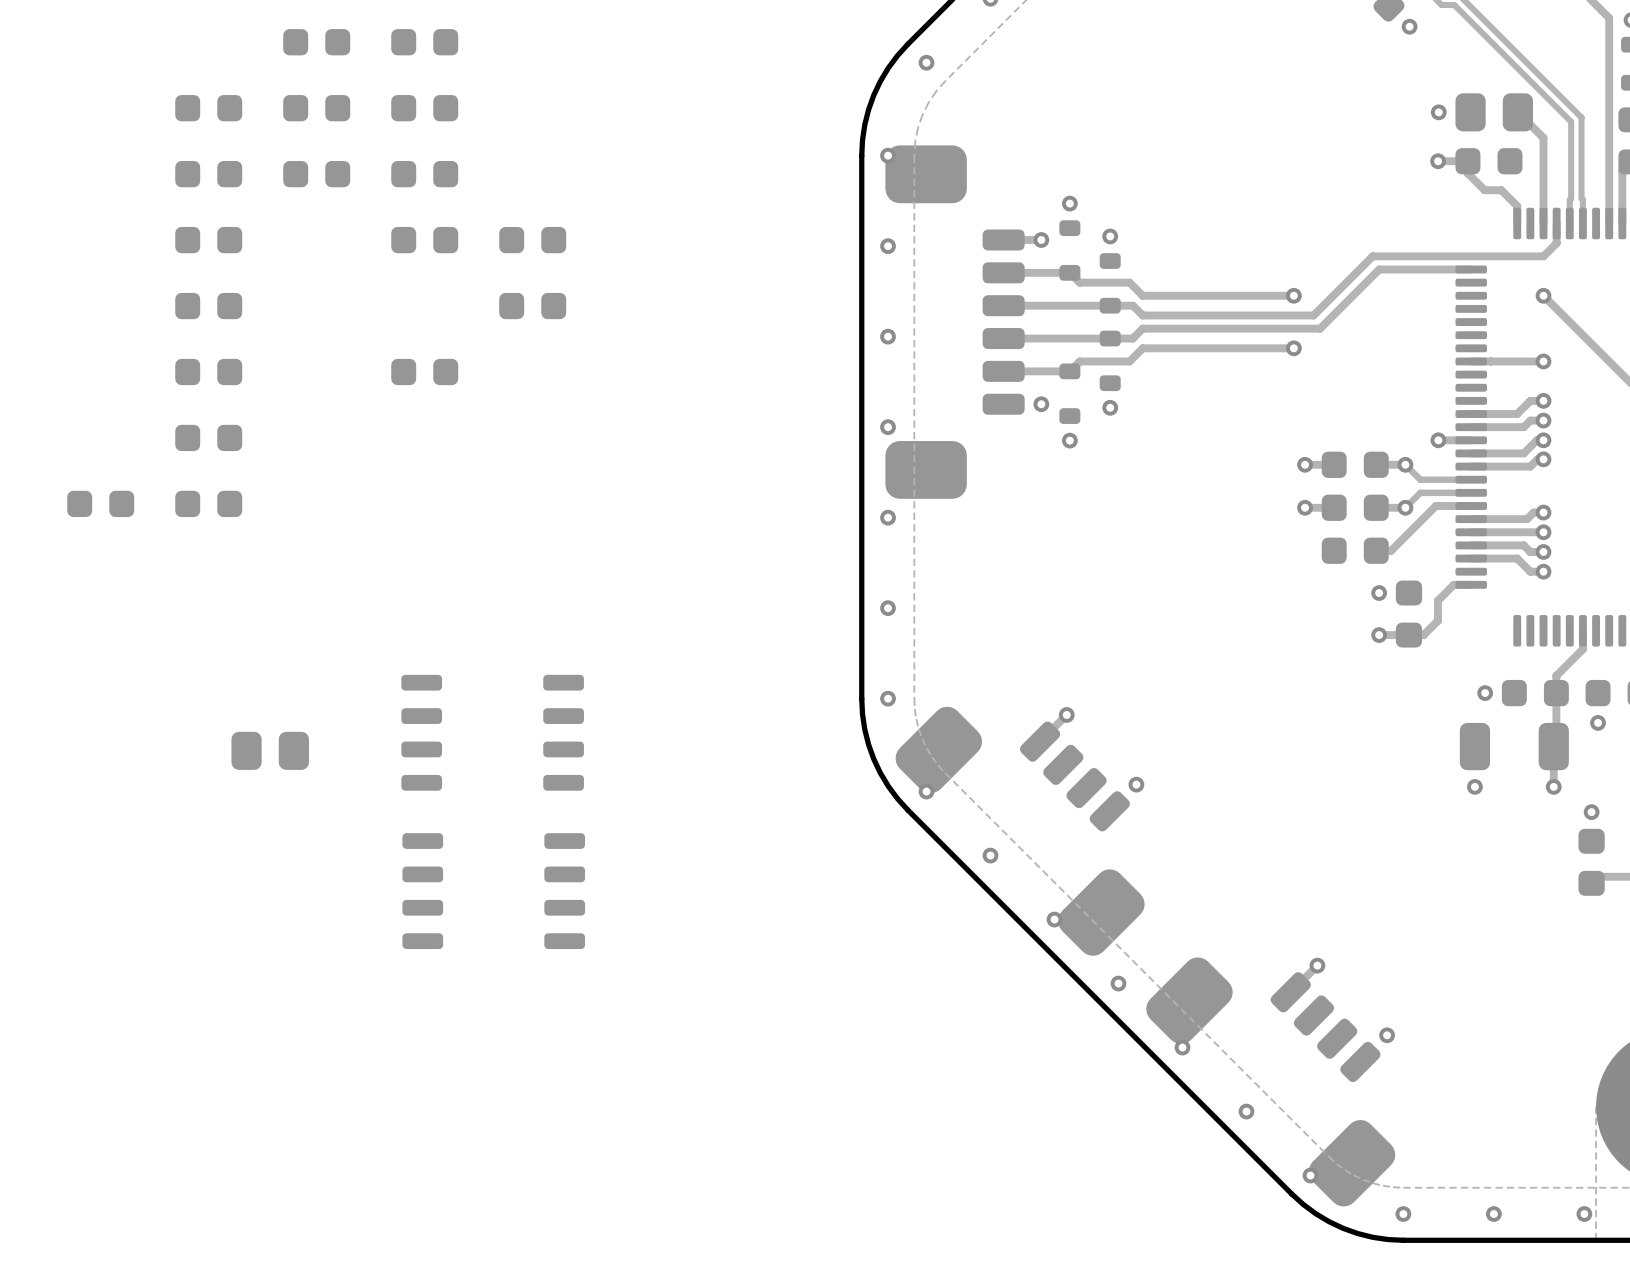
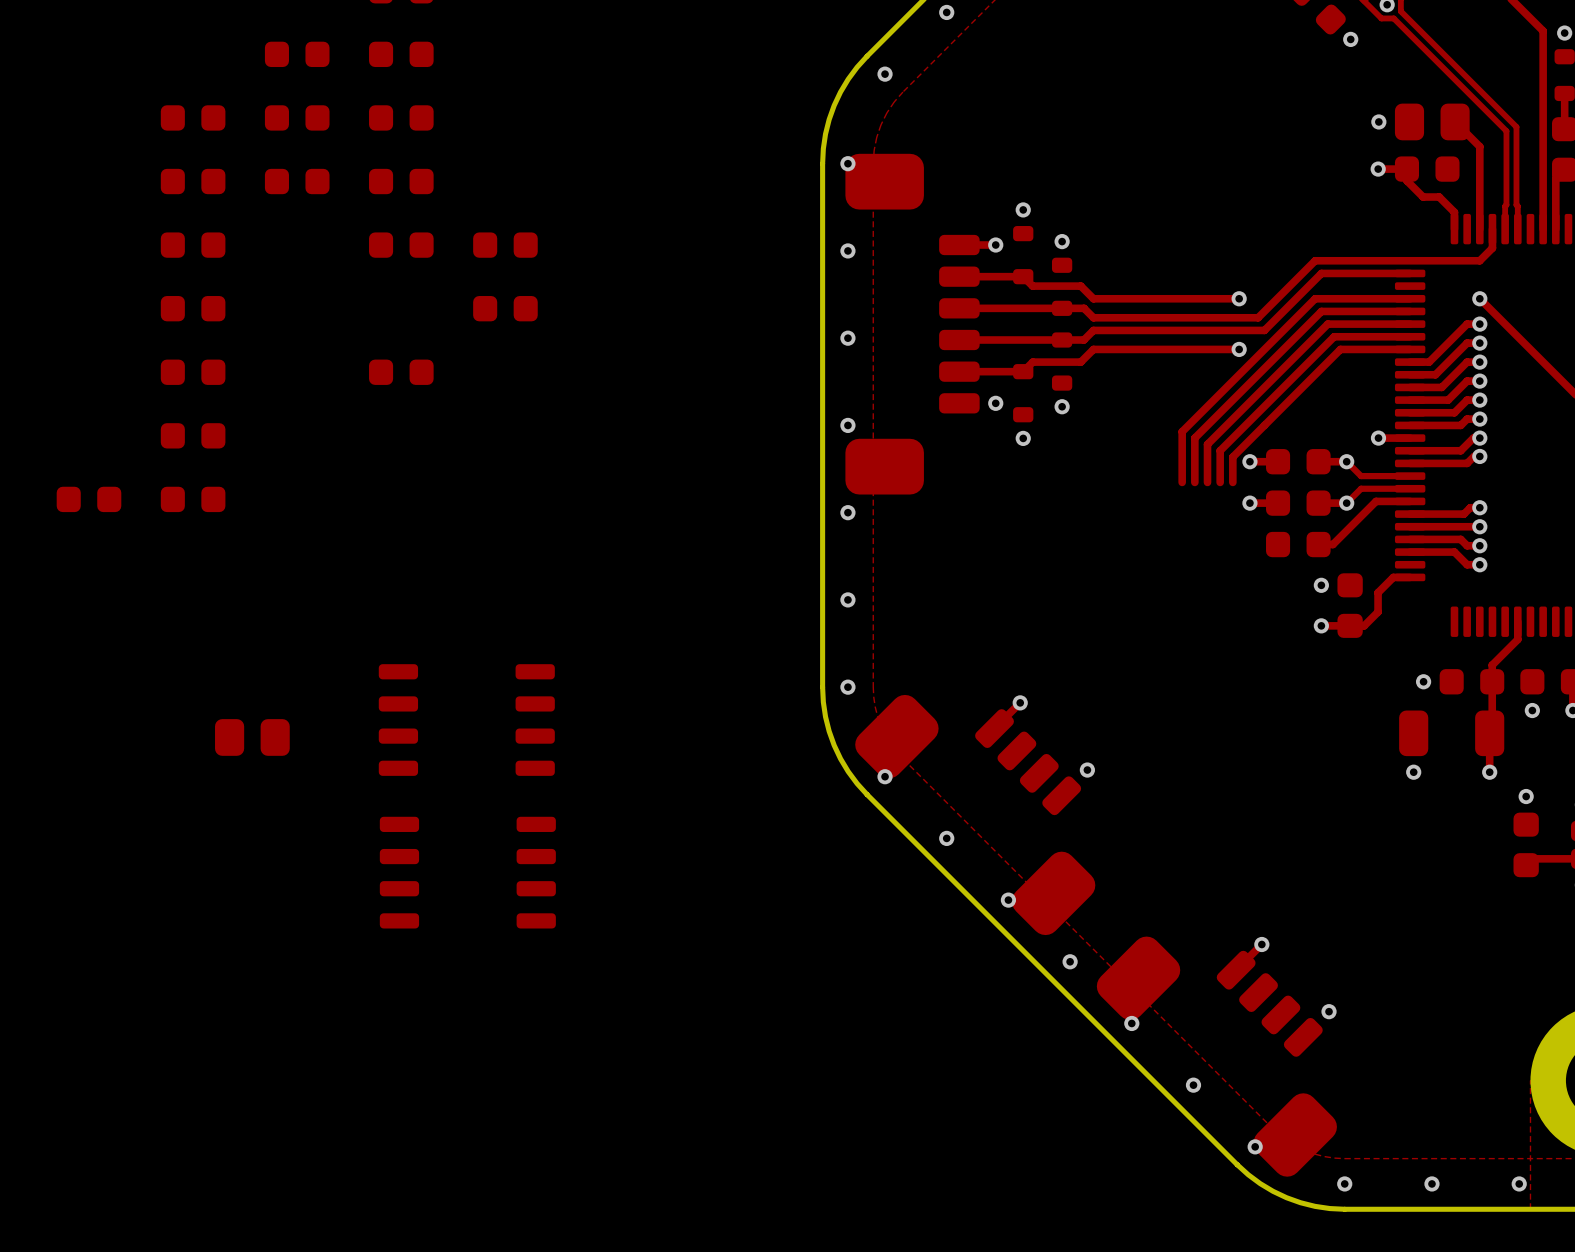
track: none -> (1410, 298) (1315, 298) (1182, 431) (1182, 482)
track: none -> (1410, 311) (1321, 311) (1194, 438) (1194, 482)
track: none -> (1410, 324) (1327, 324) (1207, 444) (1207, 482)
track: none -> (1479, 324) (1467, 324) (1429, 362)
via: none -> (1479, 324)
track: none -> (1410, 336) (1334, 336) (1220, 450) (1220, 482)
track: none -> (1479, 343) (1467, 343) (1435, 374) (1410, 374)
via: none -> (1479, 343)
track: none -> (1410, 349) (1340, 349) (1232, 457) (1232, 482)
track: (1490, 361) (1530, 361) -> (1410, 387) (1441, 387) (1467, 362)
track: none -> (1479, 381) (1467, 381) (1448, 400) (1410, 400)
via: none -> (1479, 381)

